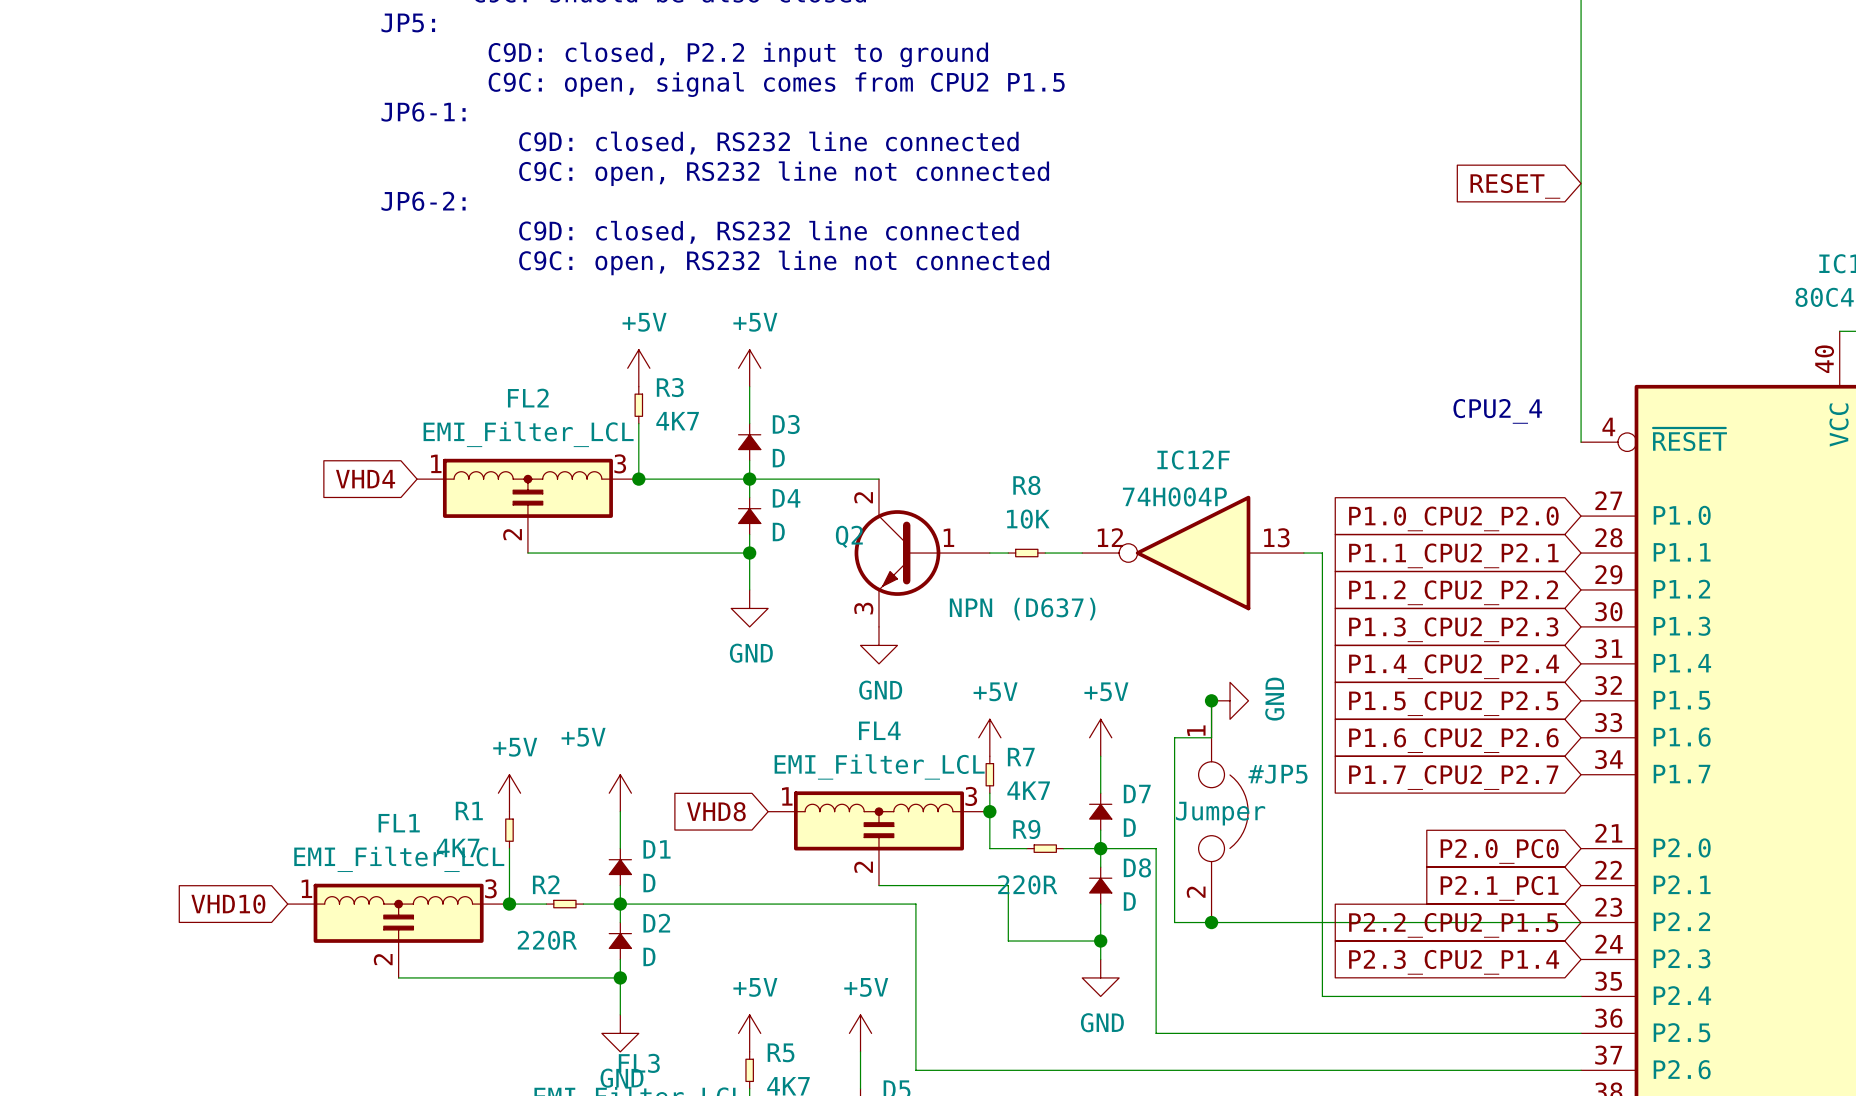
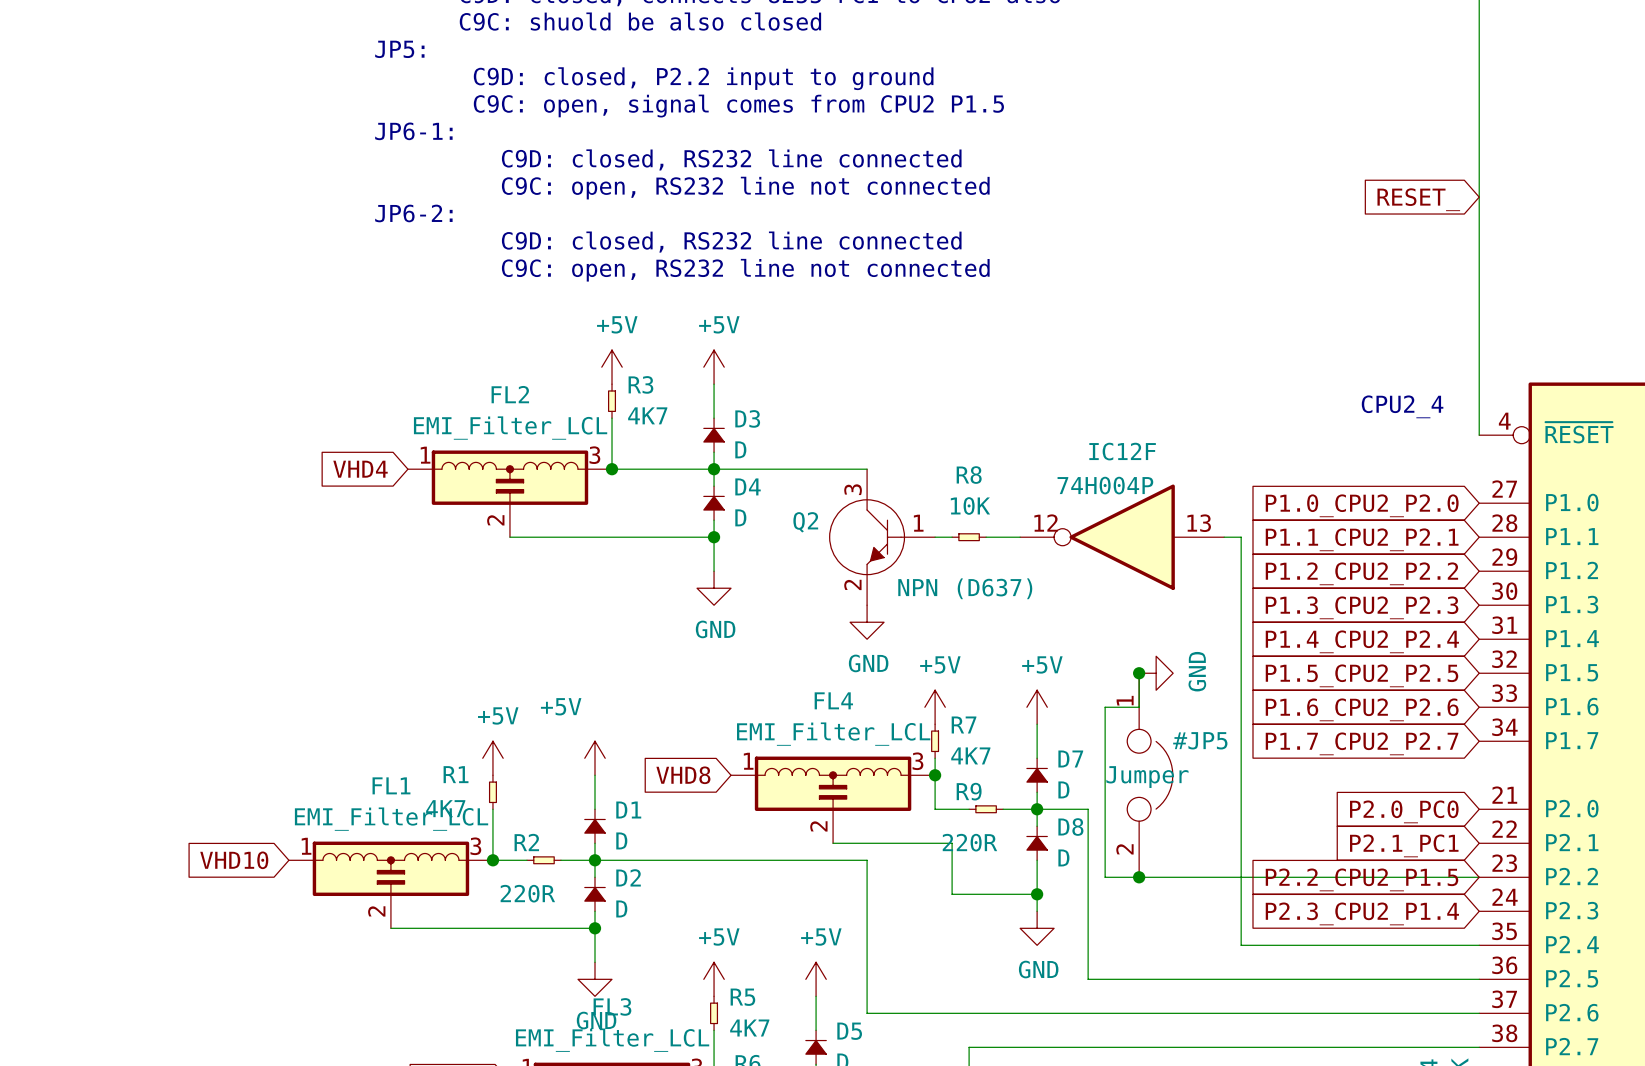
Q2 symbol: [854, 479, 990, 627] -> [829, 469, 936, 606]
wire: none -> (833, 469) (867, 469)
power symbol position: GND (878, 645) -> GND (867, 622)

